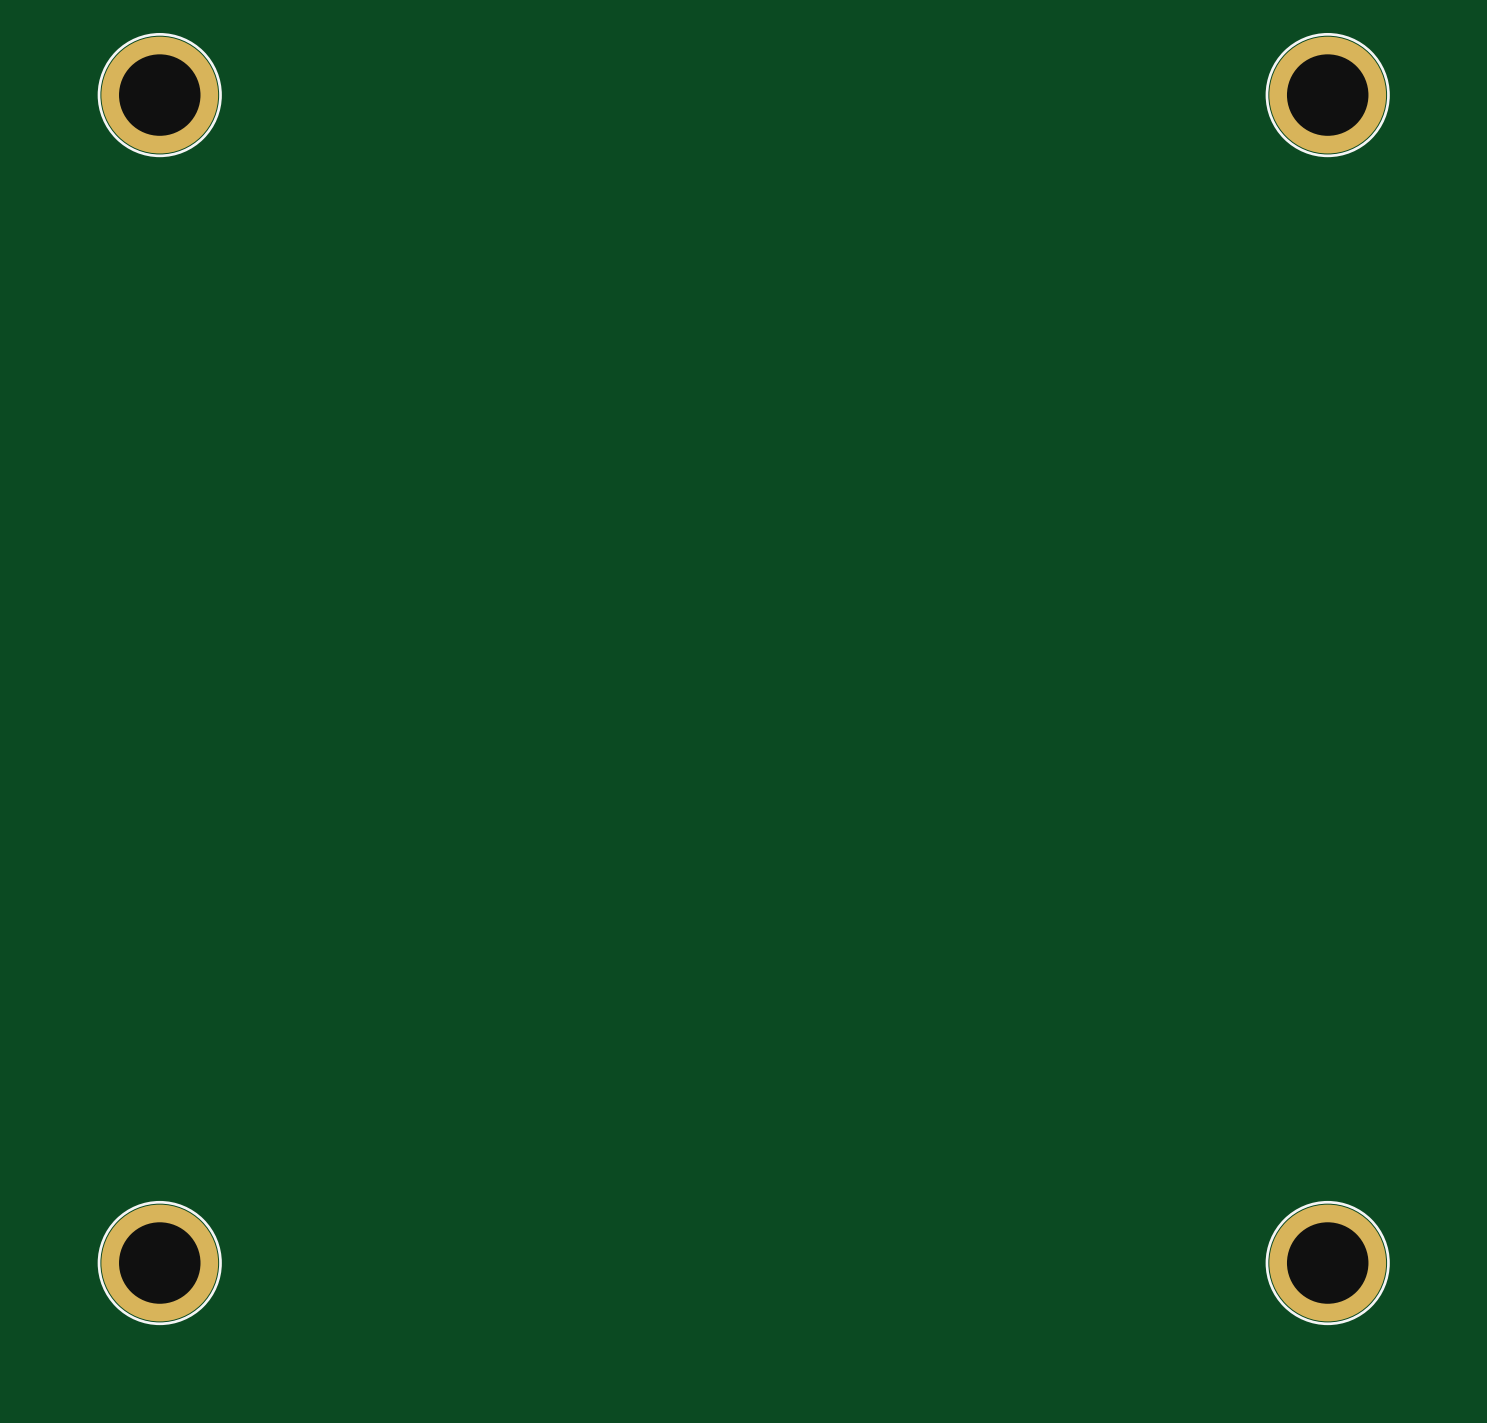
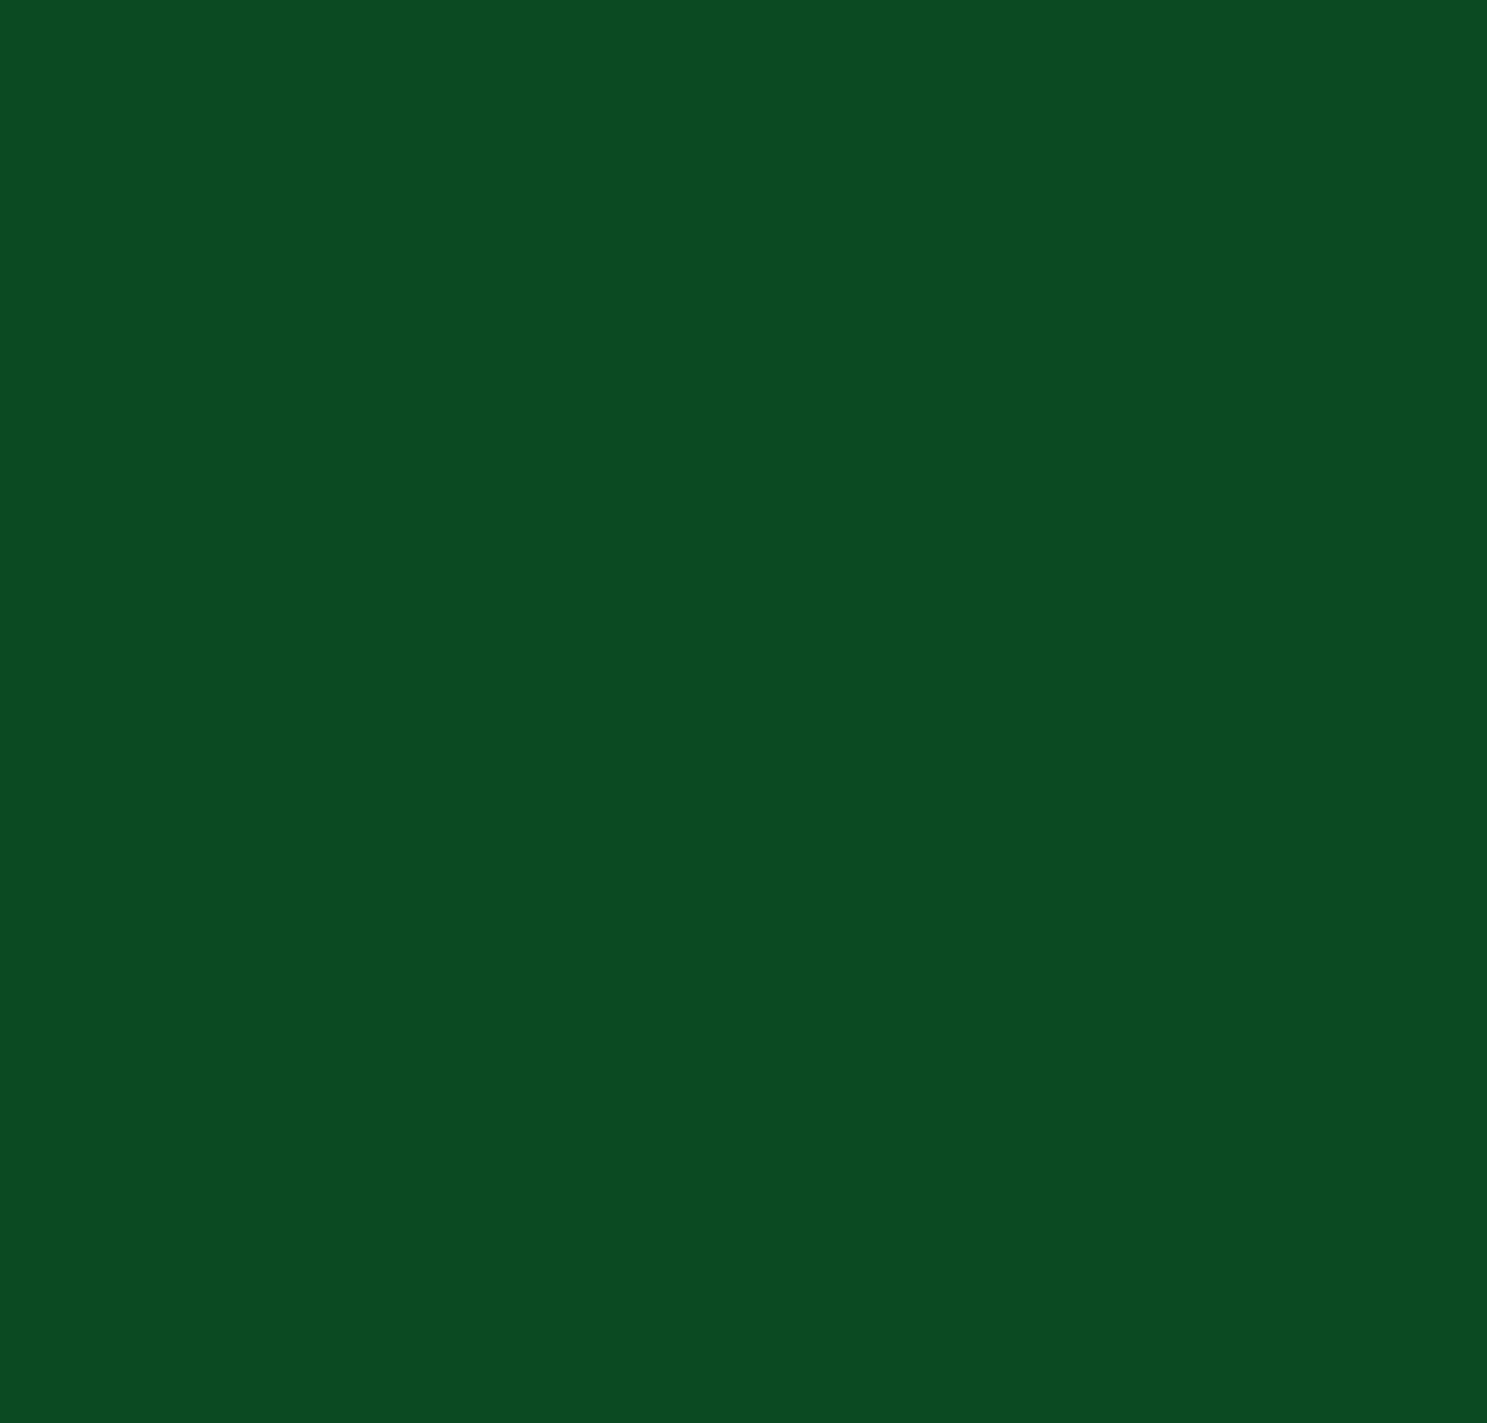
part: (159, 95) -> none
part: (1327, 95) -> none
part: (159, 1263) -> none
part: (1327, 1263) -> none

